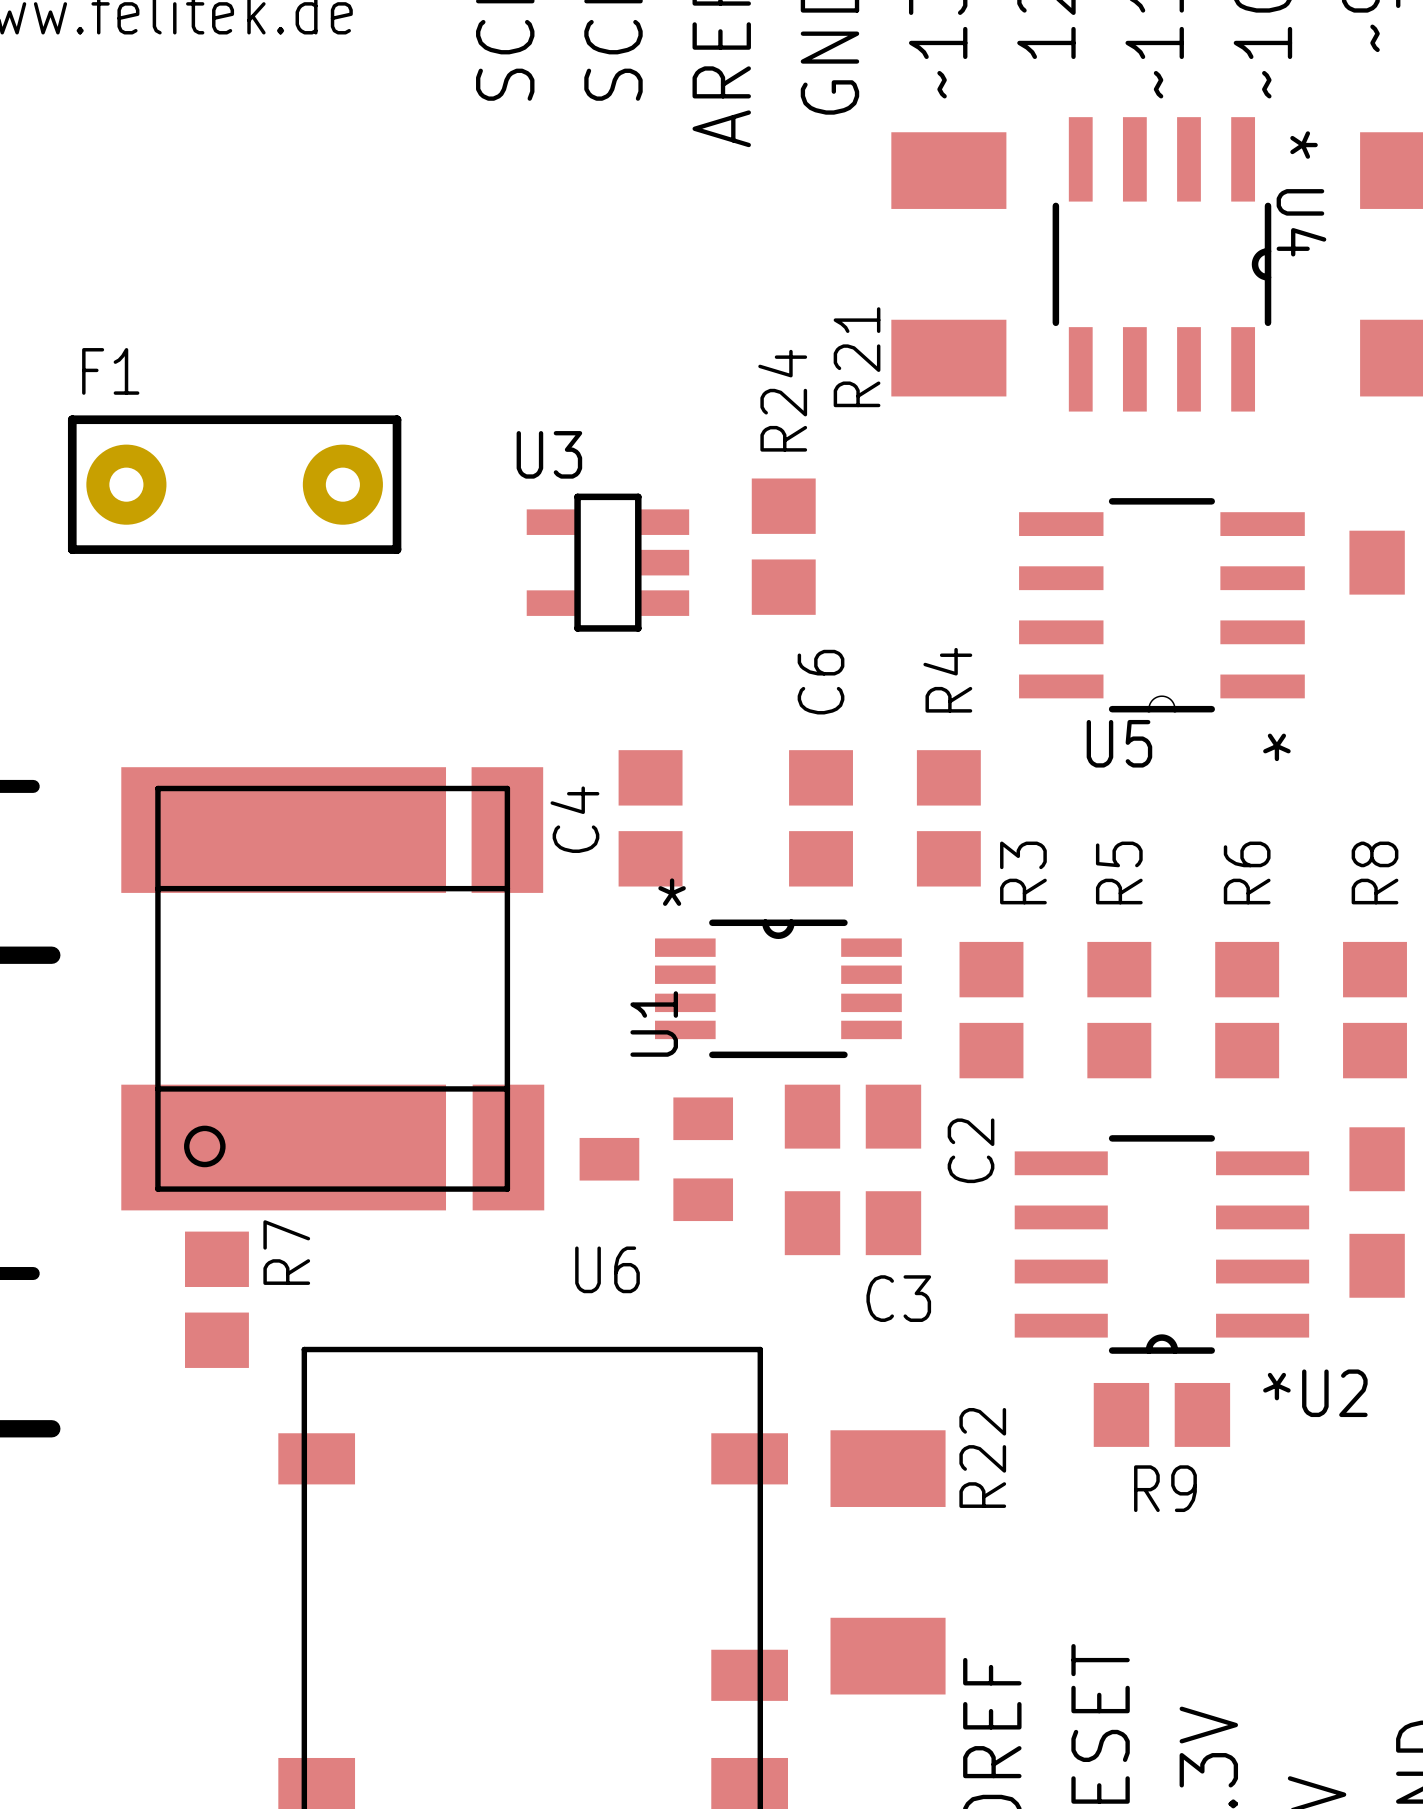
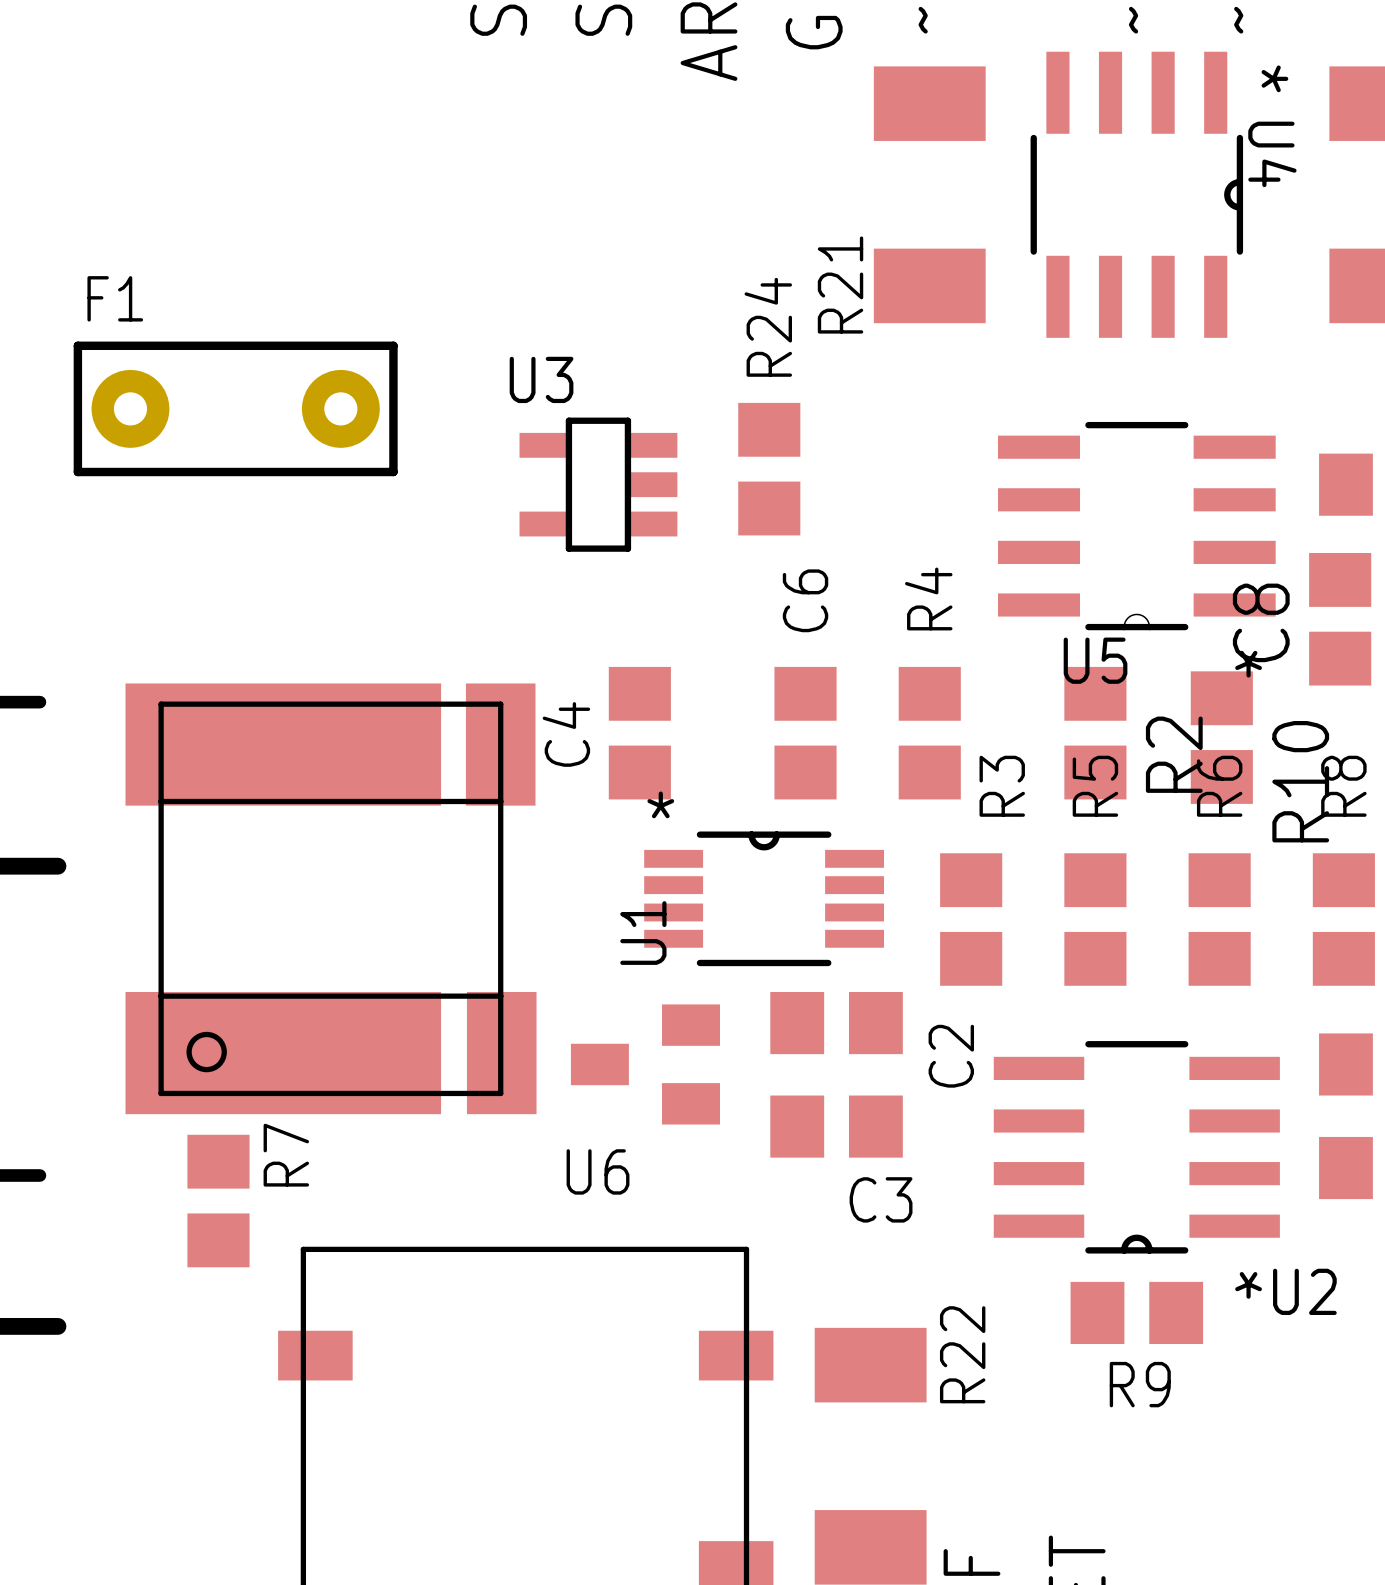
C8: none -> (1340, 619)
R2: none -> (1095, 733)
R10: none -> (1221, 737)

